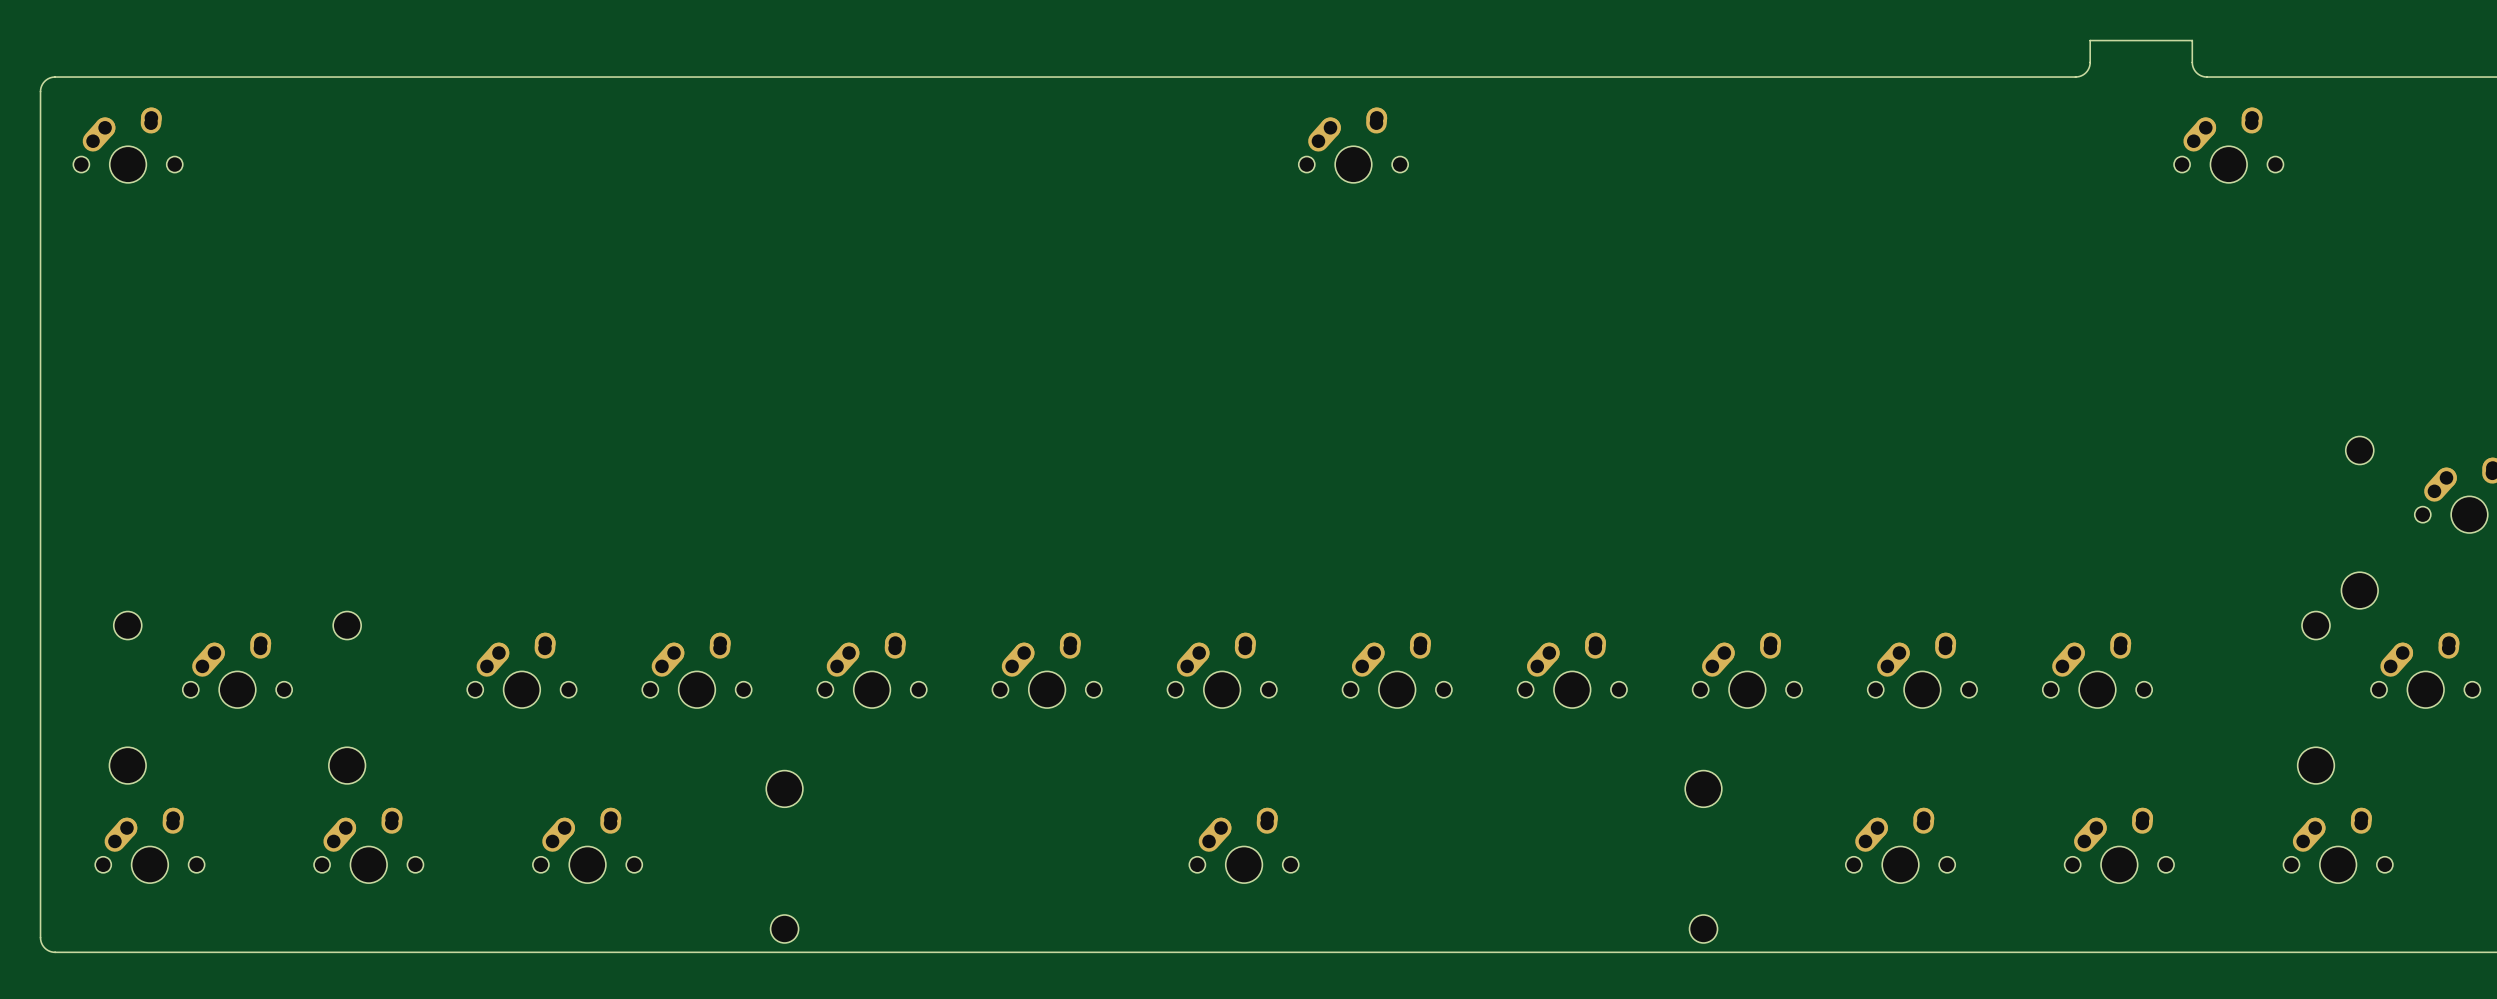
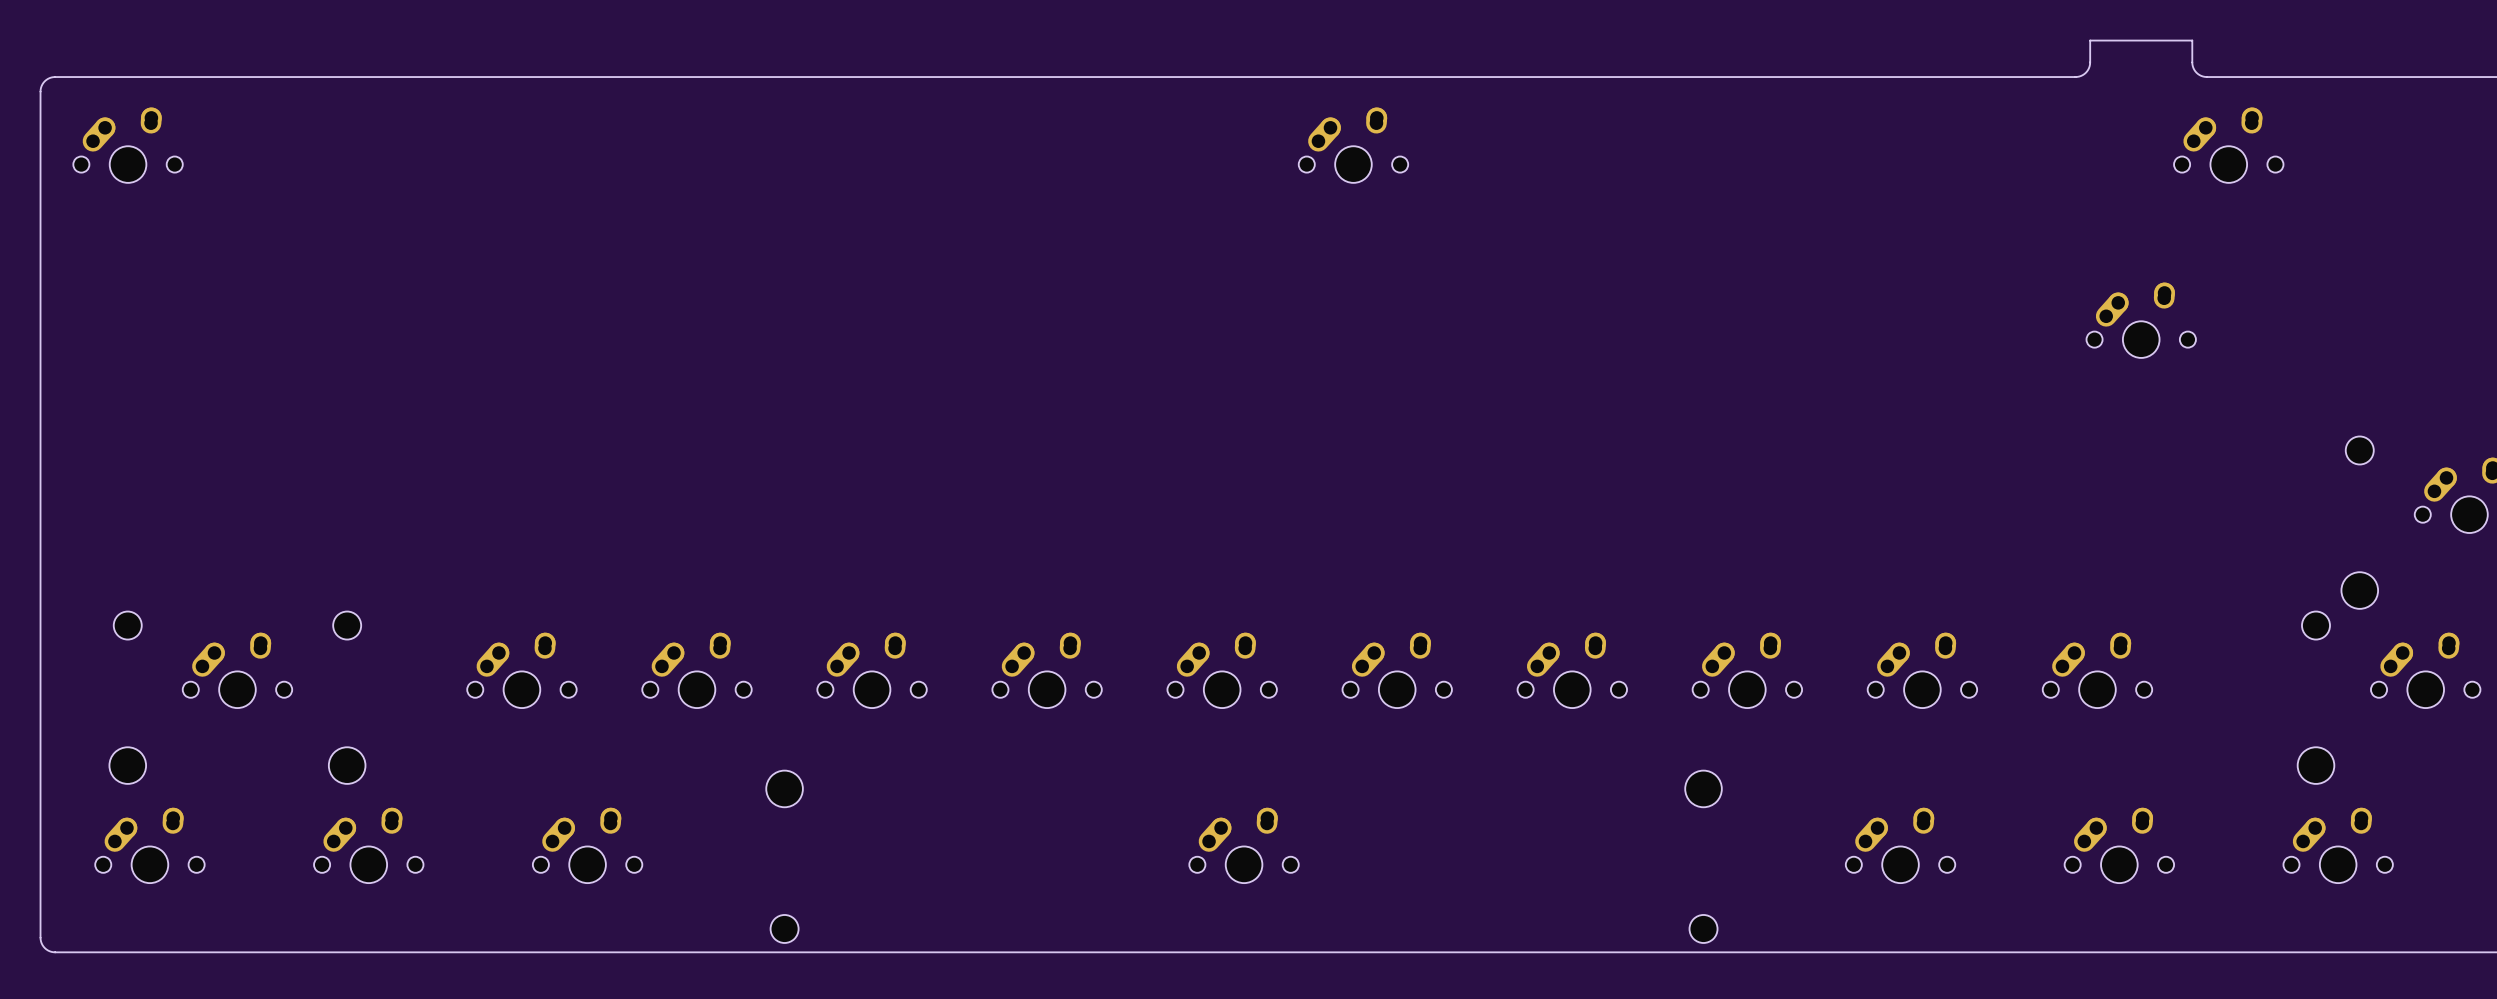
part: none -> (2141, 320)

